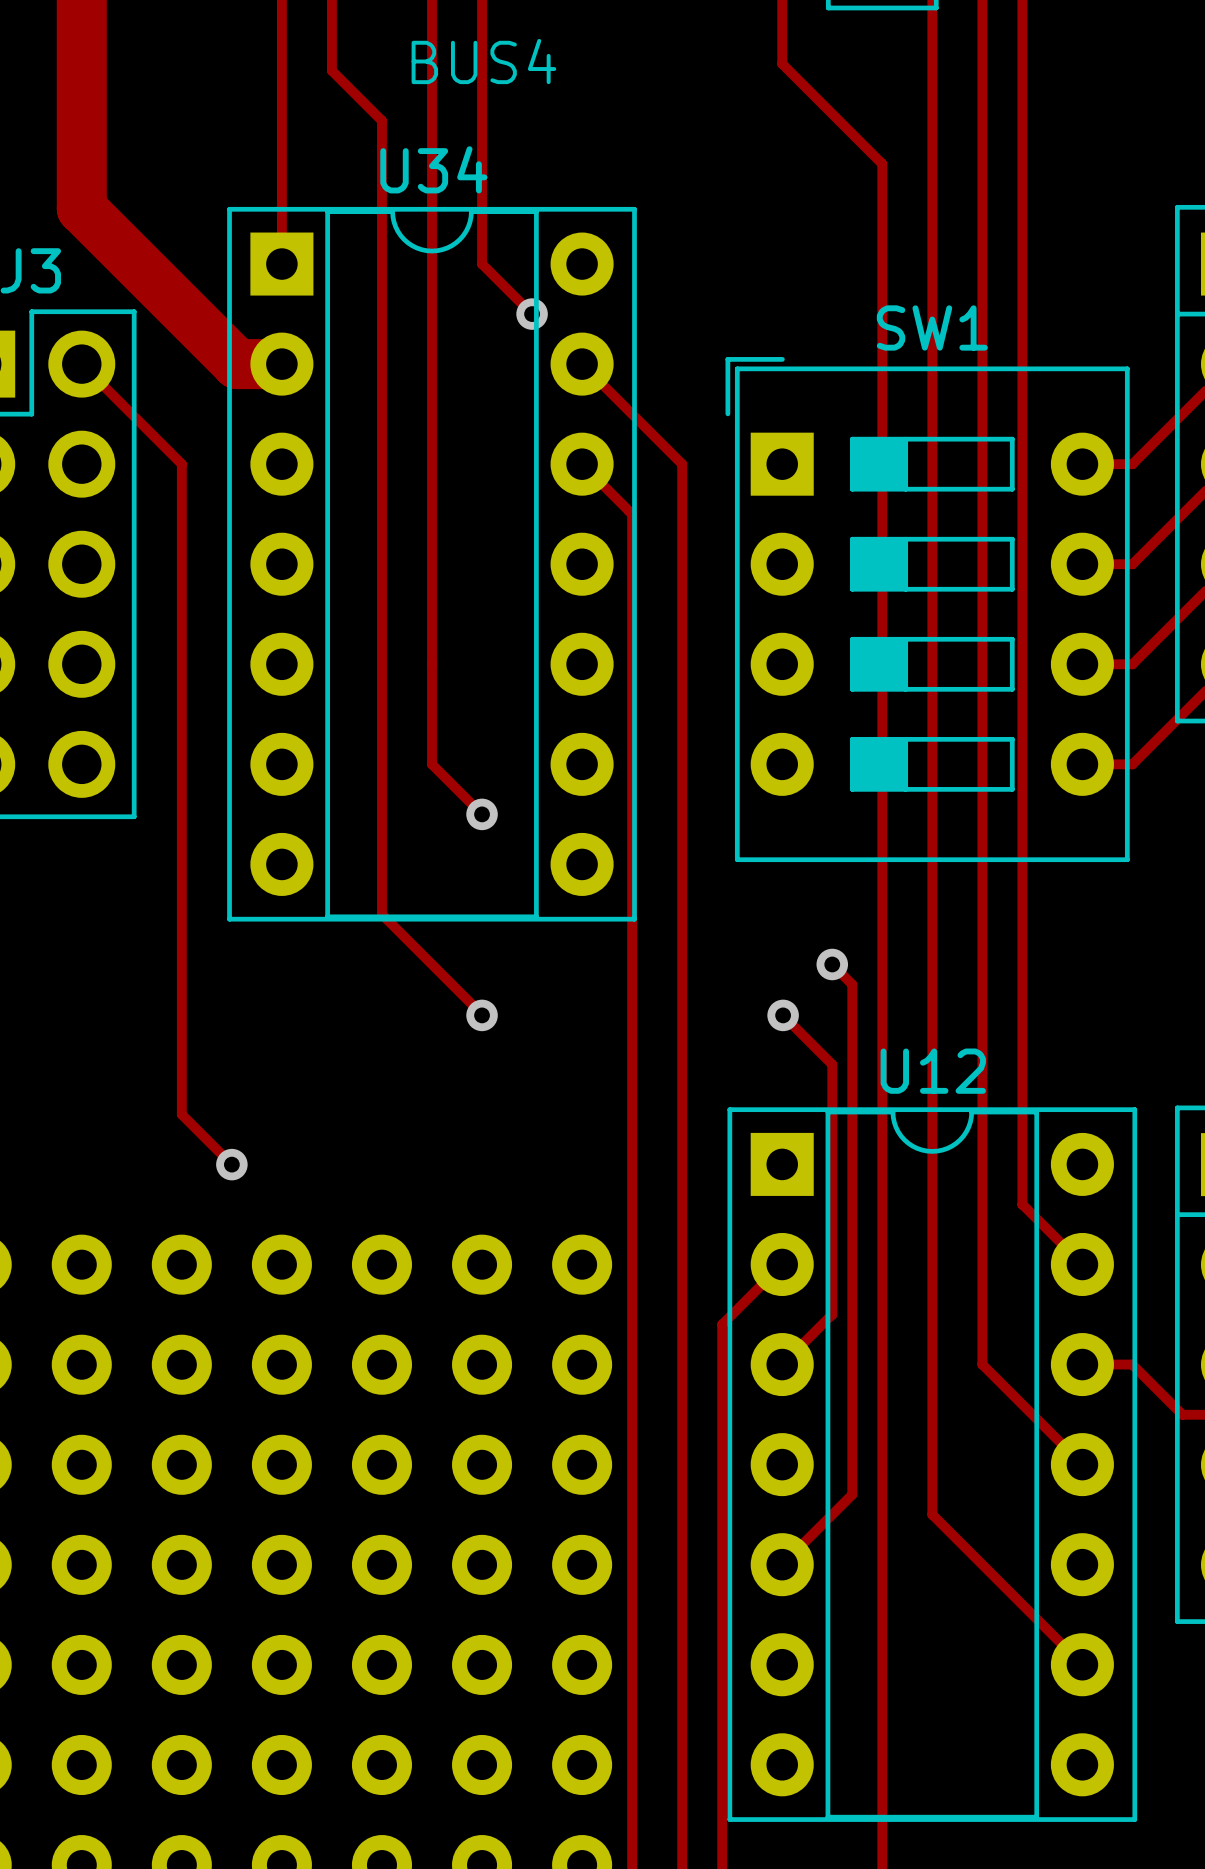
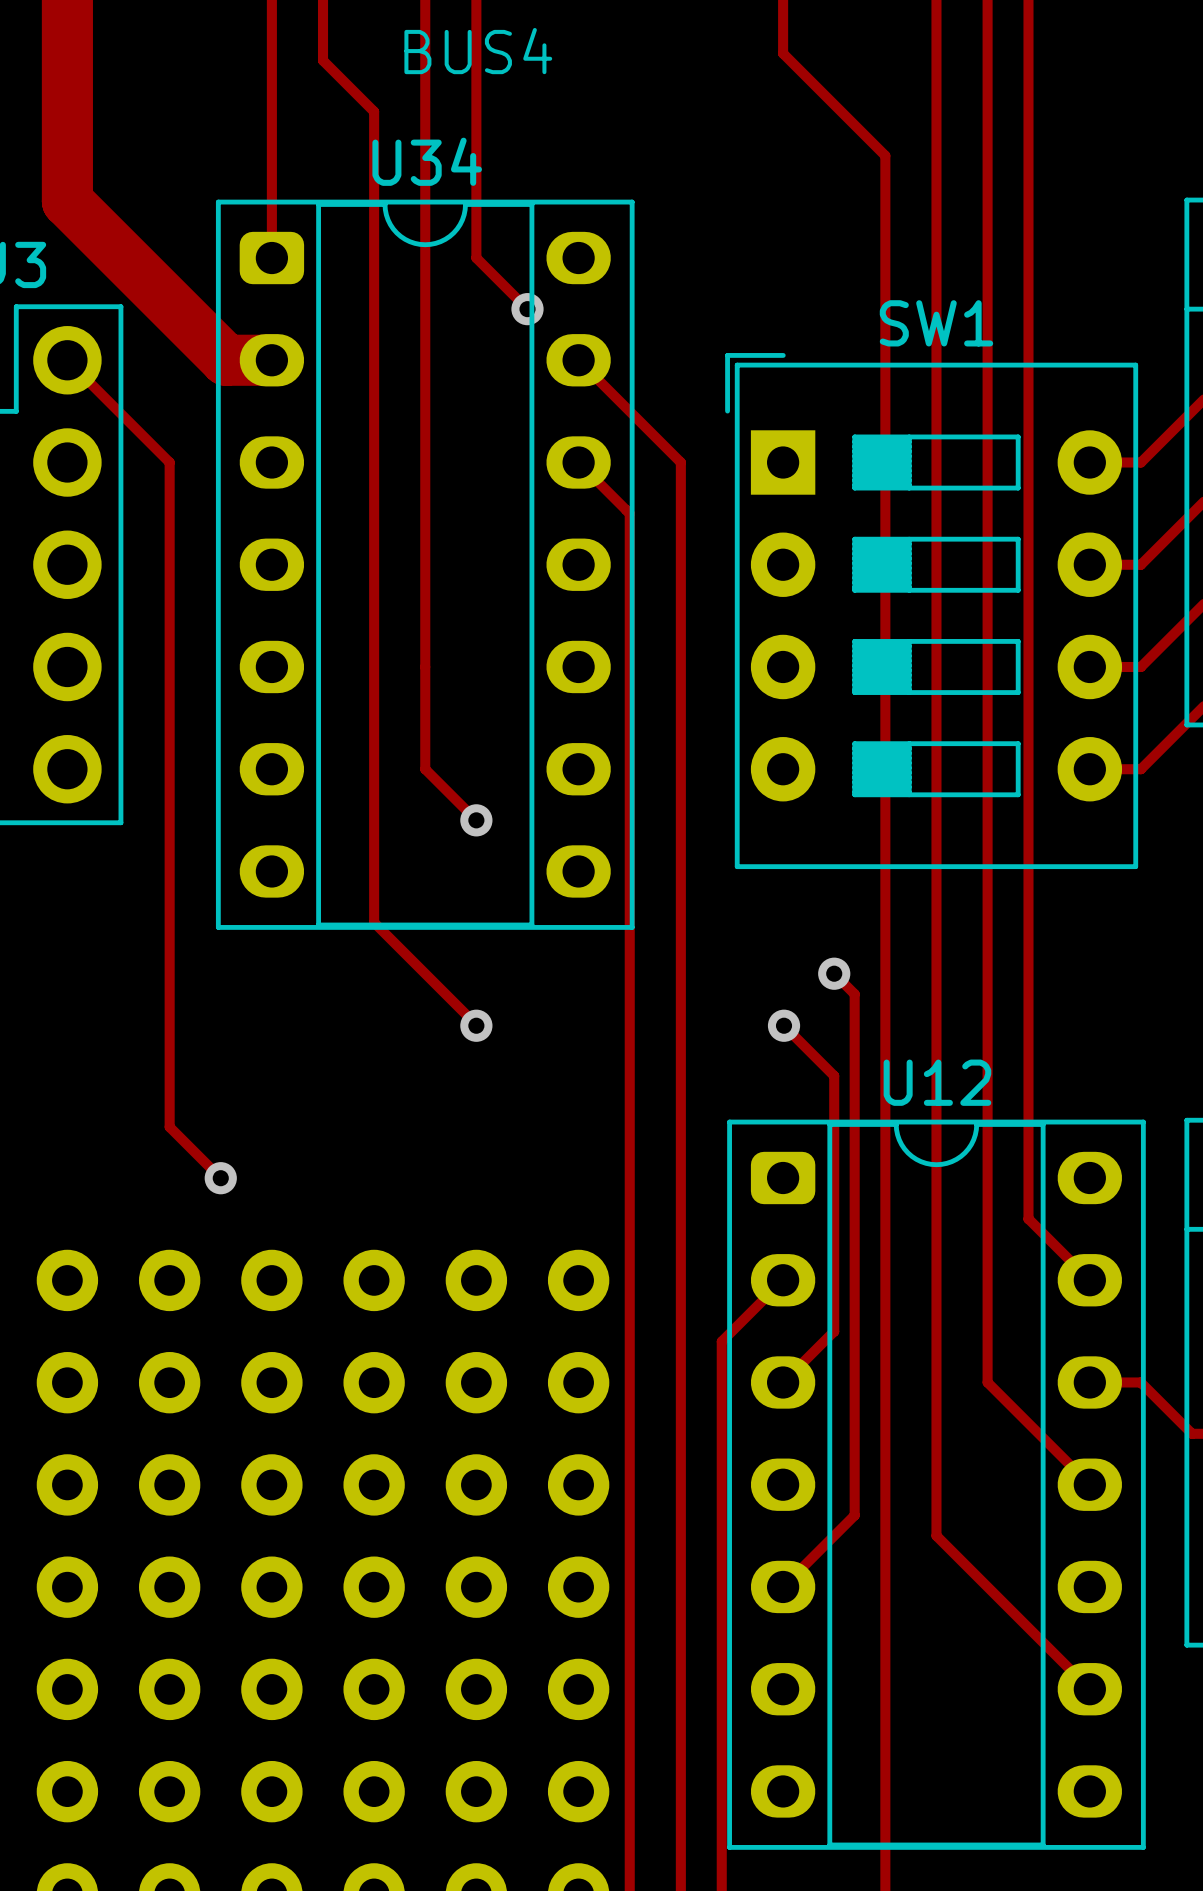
U34 footprint: [227, 206, 637, 922] -> [215, 199, 635, 930]
U12 footprint: [727, 1107, 1138, 1822] -> [727, 1119, 1146, 1850]

